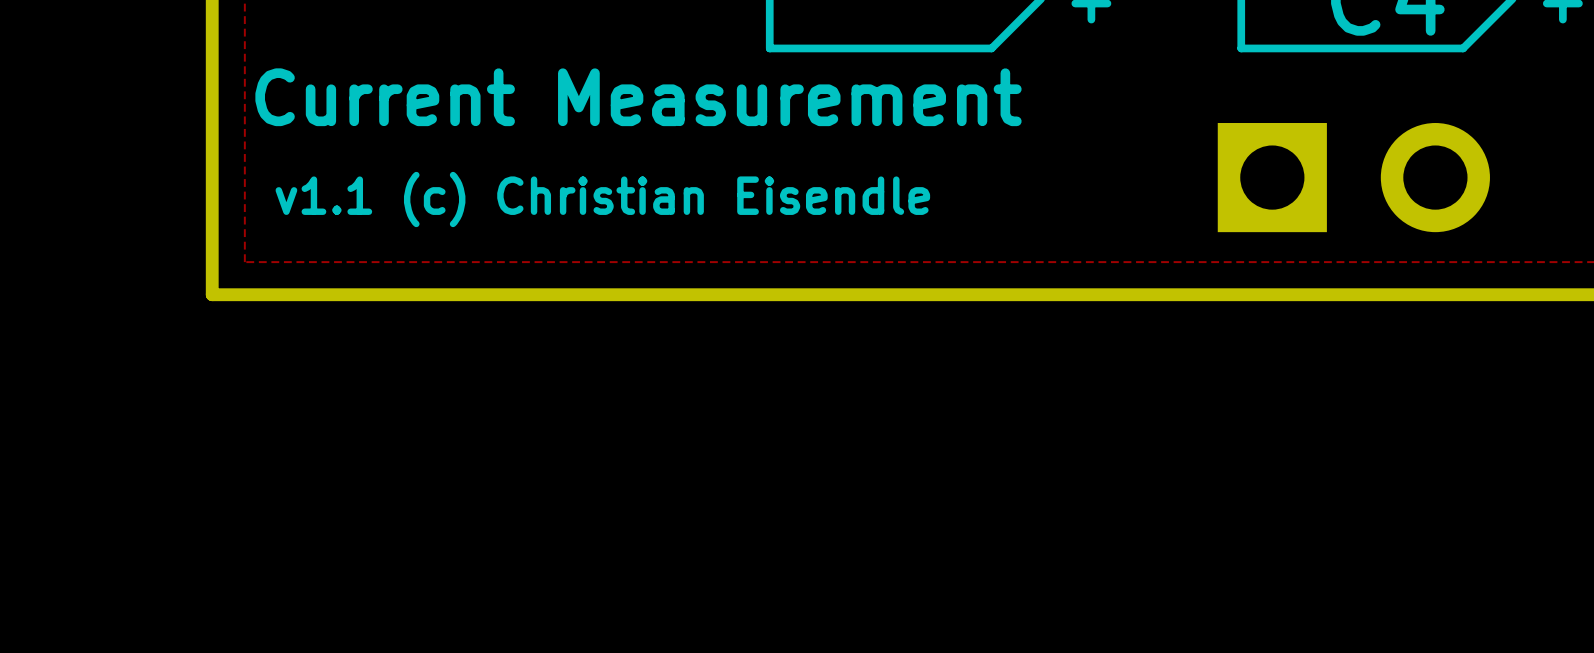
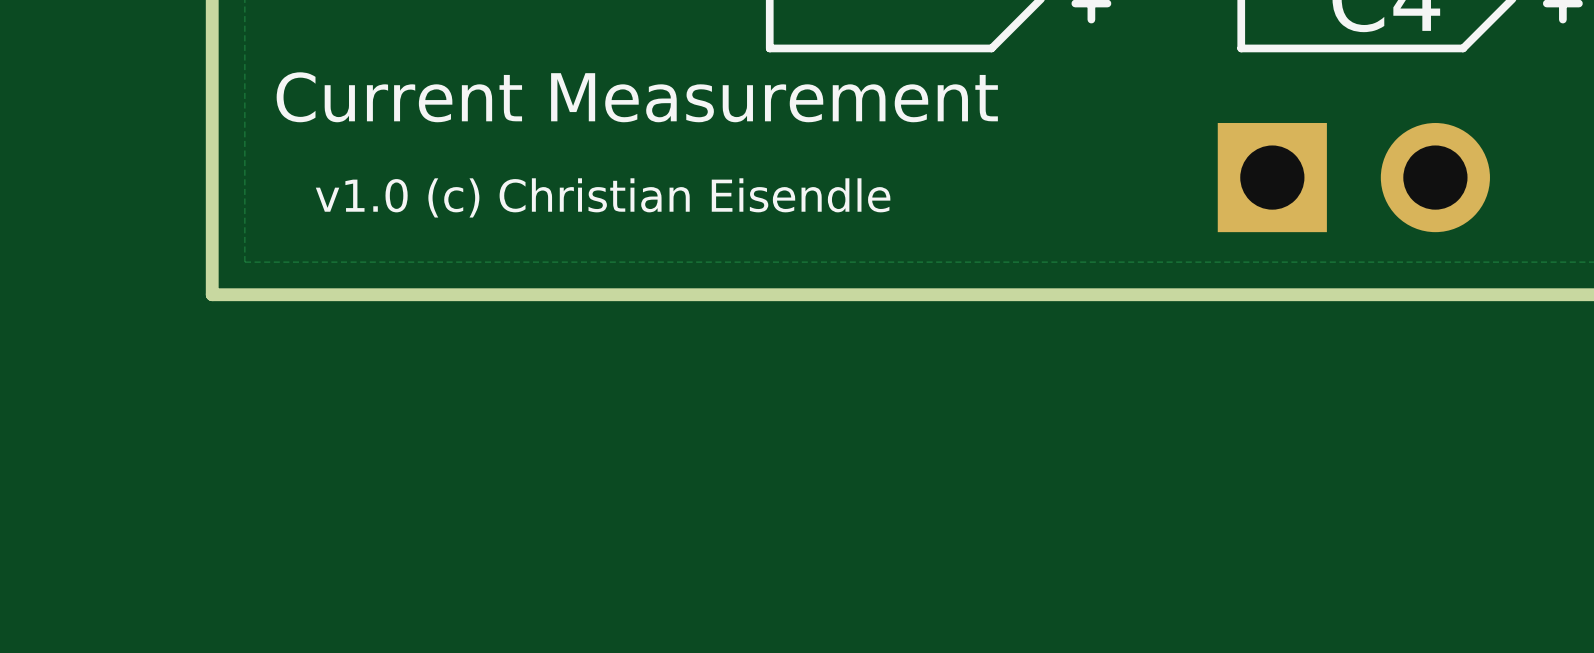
text: v1.1 (c) Christian Eisendle (602, 199) -> v1.0 (c) Christian Eisendle (603, 197)

